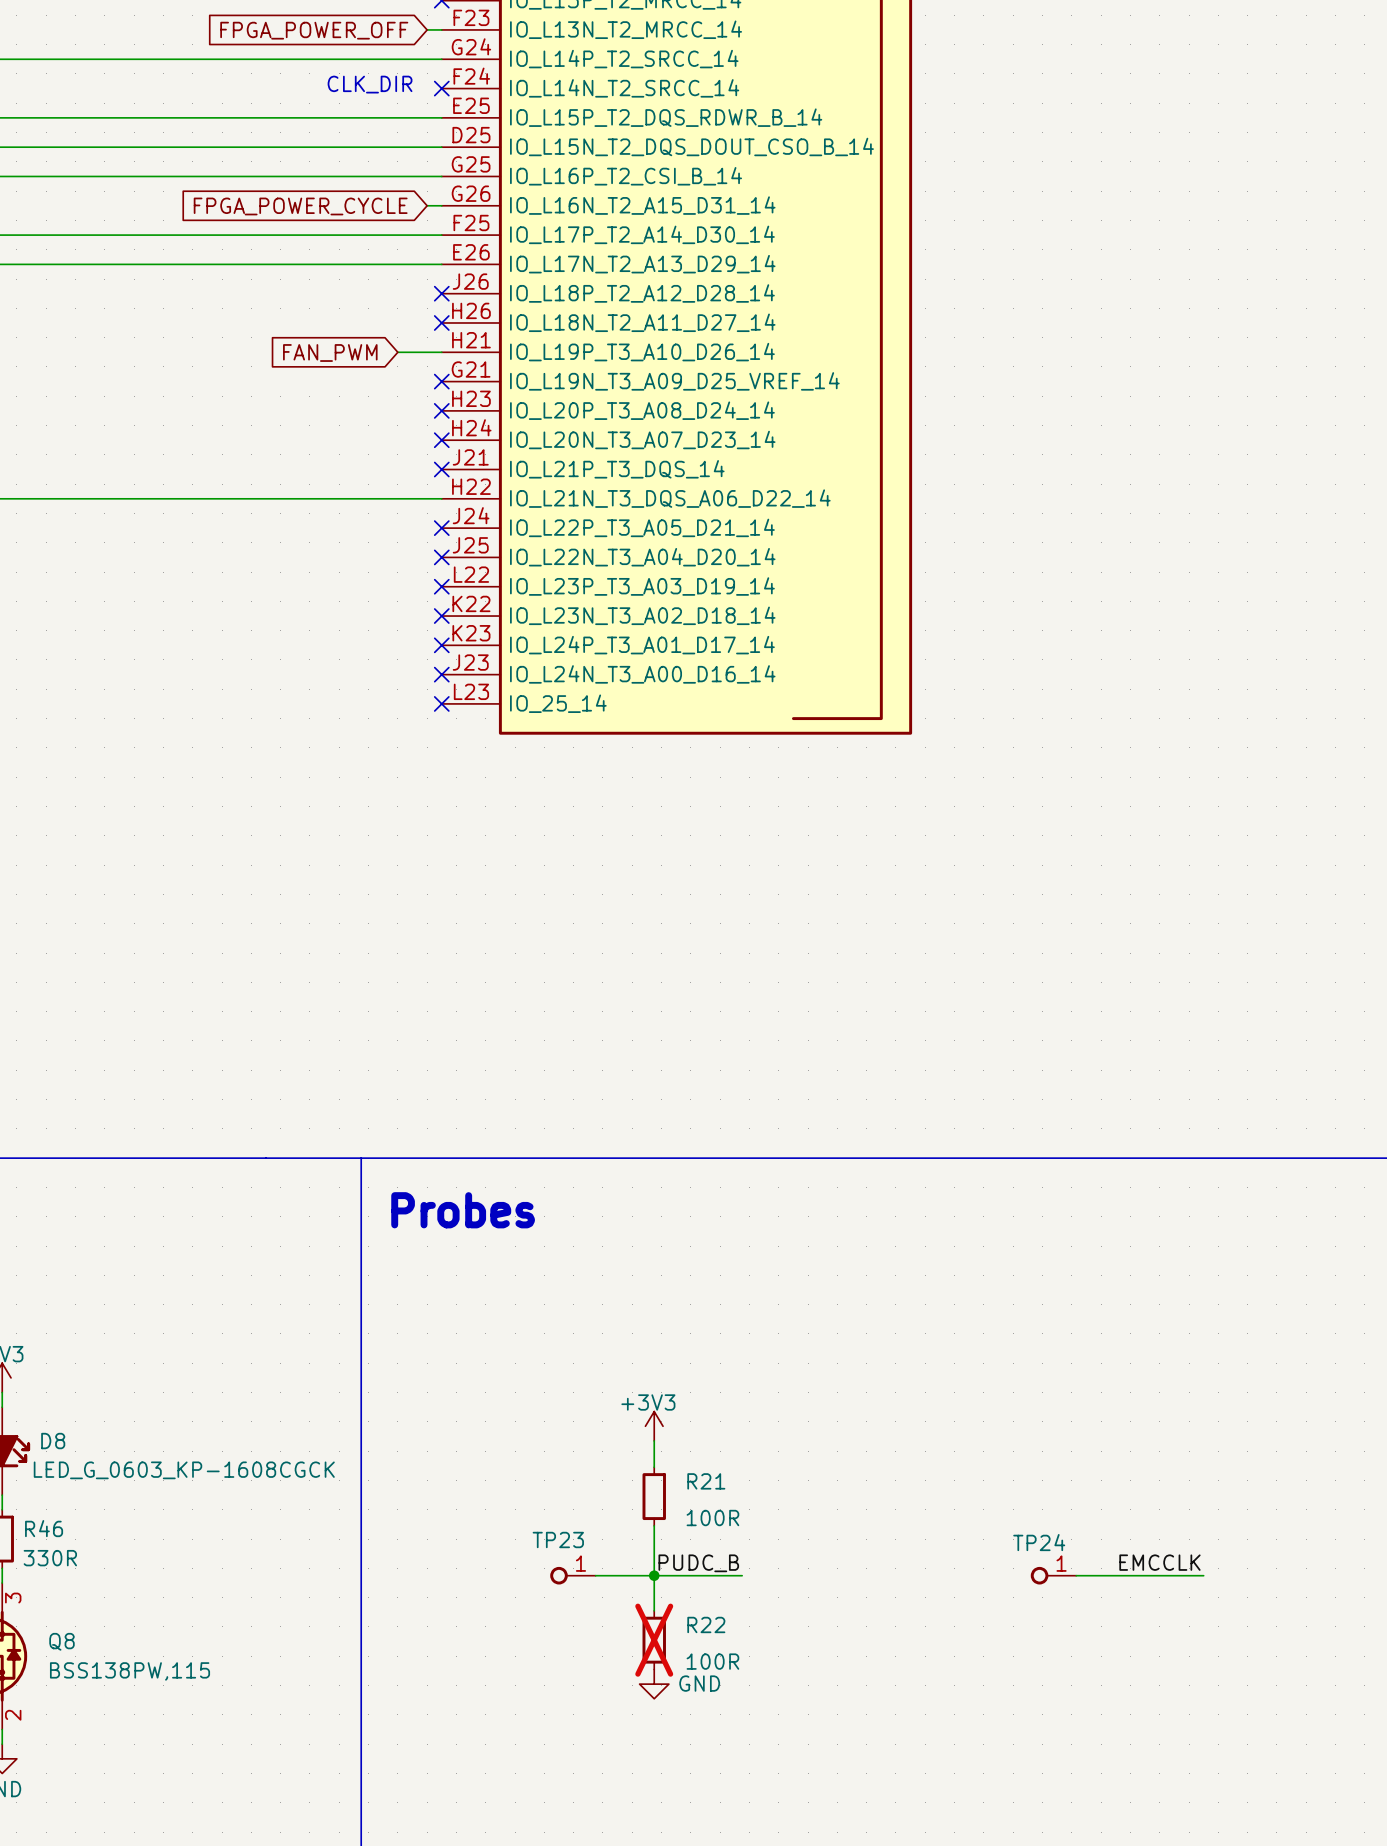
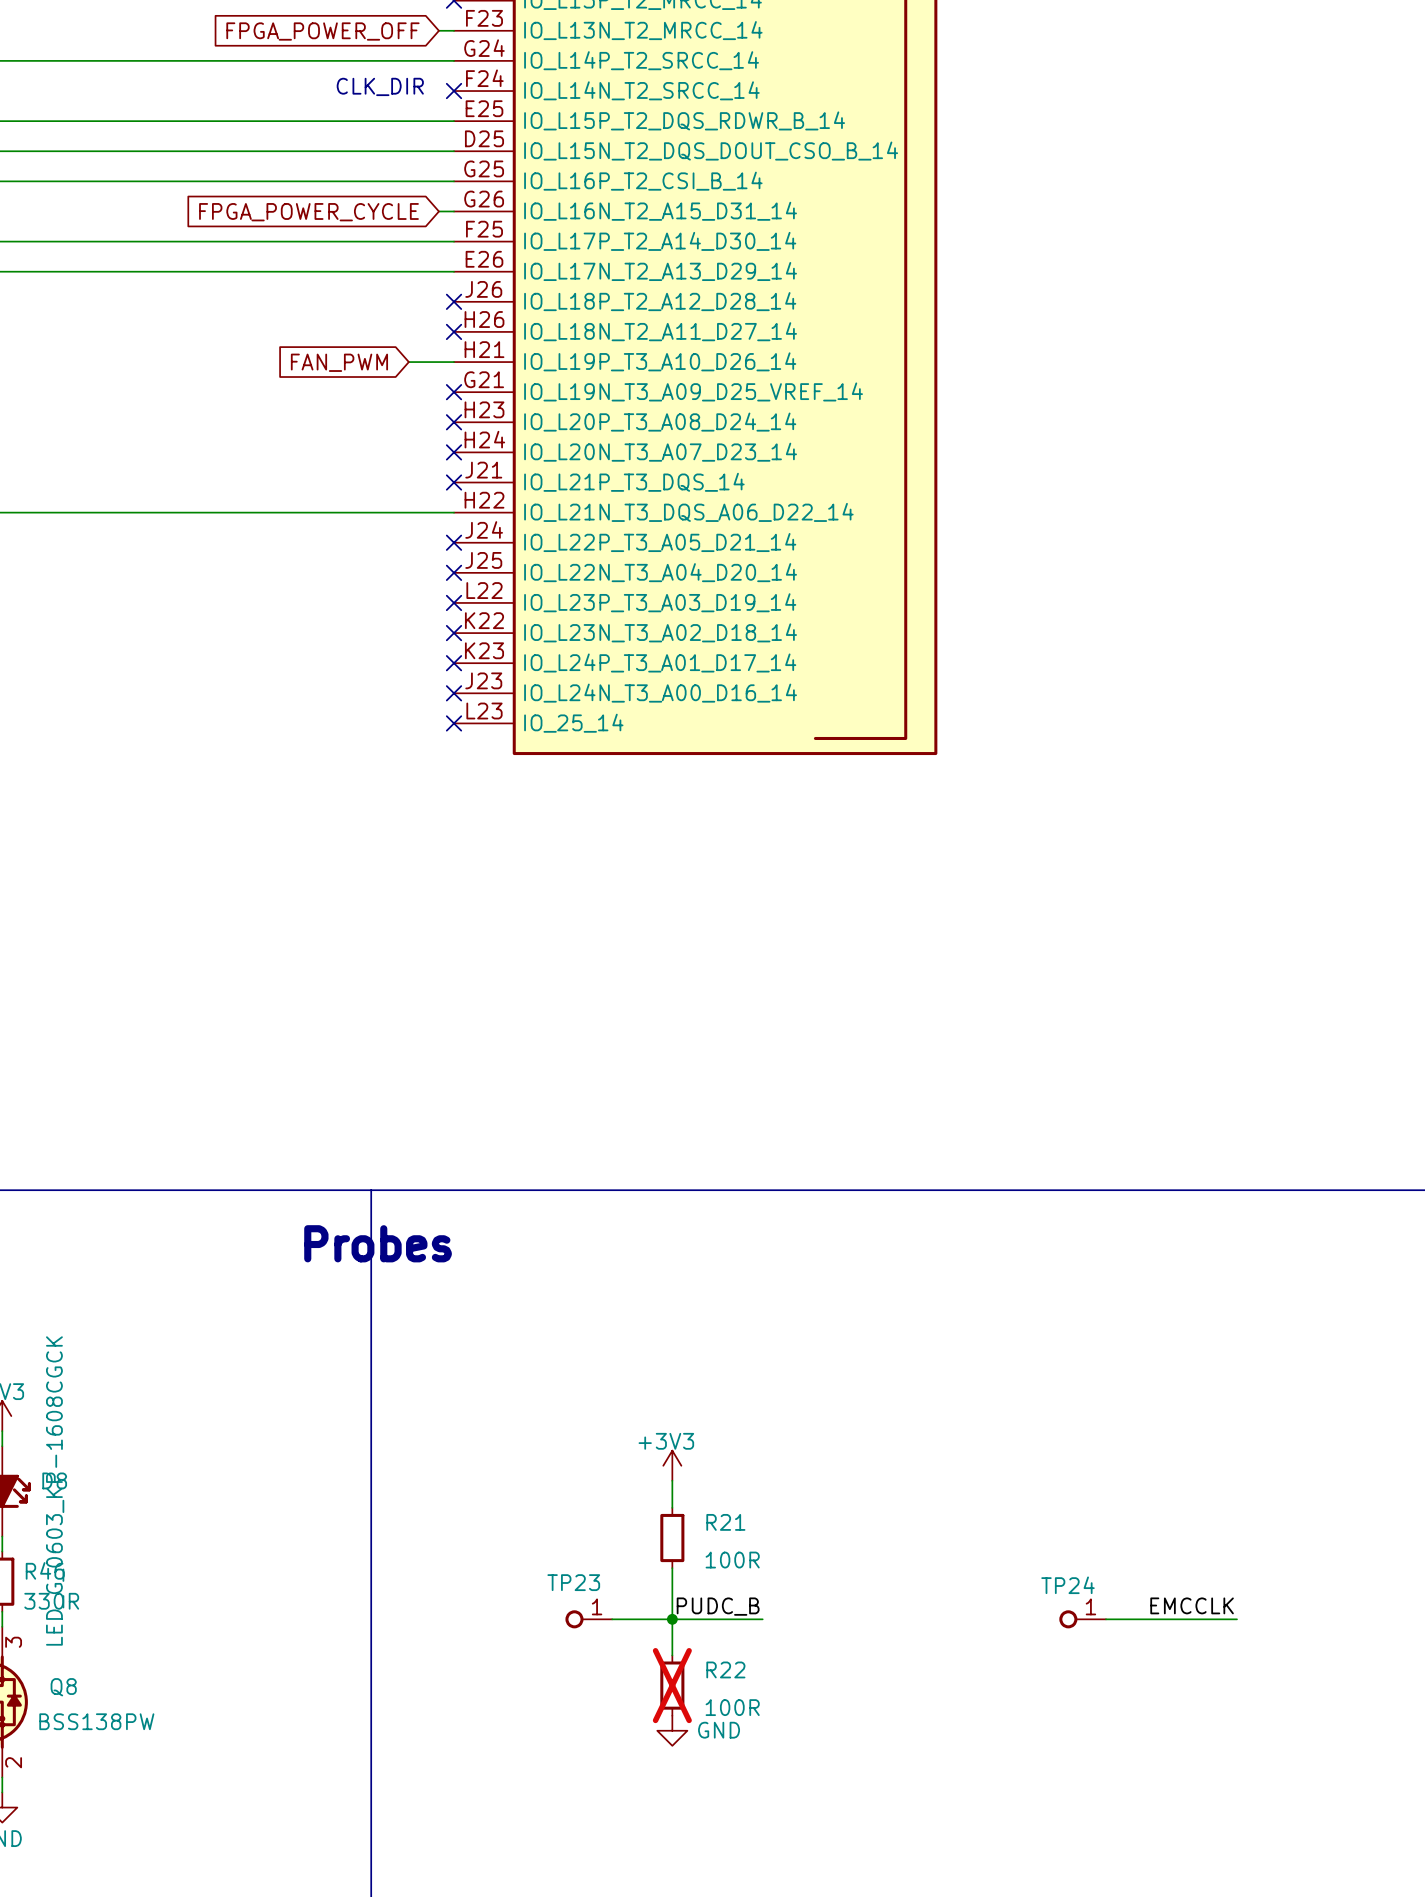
text position: Probes (463, 1210) -> Probes (378, 1243)
D8 value rotation: 0° (184, 1470) -> 90° counterclockwise (55, 1490)
Q8 text: BSS138PW,115 (130, 1671) -> none
Q8 value: none -> BSS138PW (96, 1721)

